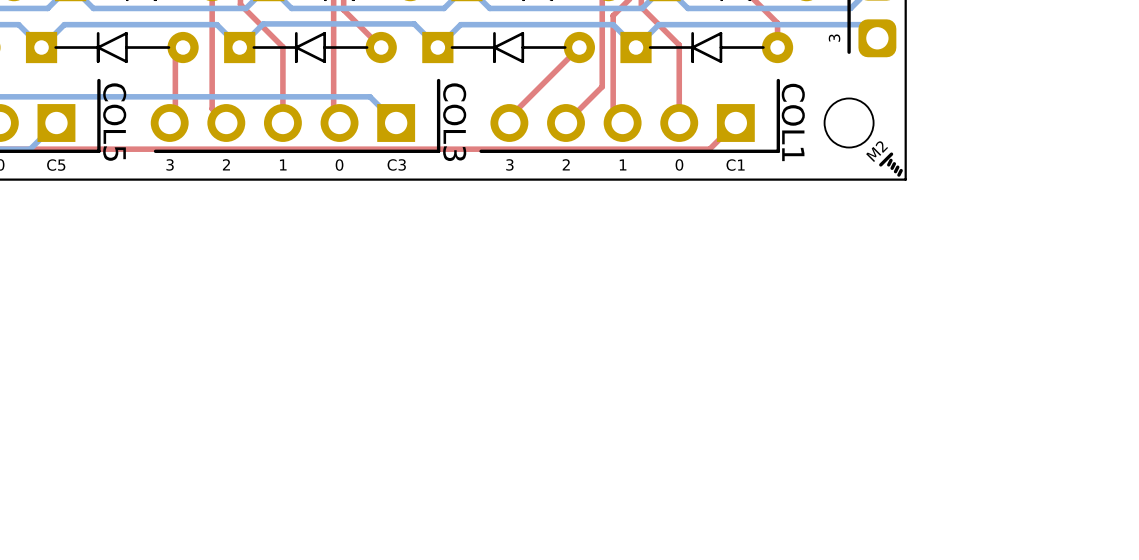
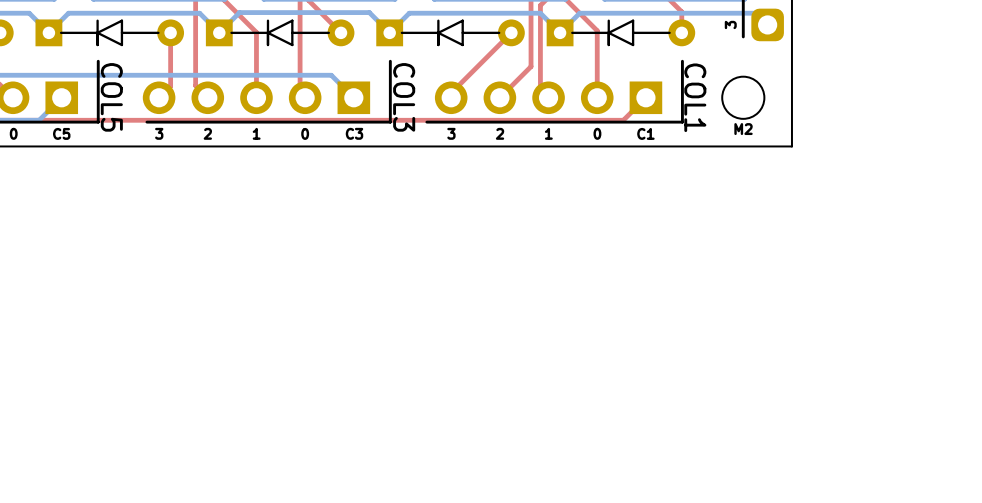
top track: none -> (170, 32) (170, 86) (159, 97)
top track: (175, 55) (175, 117) -> none
text rotation: 0° (877, 151) -> 45° clockwise (743, 129)
line: (891, 154) (880, 164) -> none
line: (890, 160) (888, 164) -> none
line: (894, 163) (892, 168) -> none
line: (897, 167) (895, 171) -> none
line: (901, 170) (898, 175) -> none

